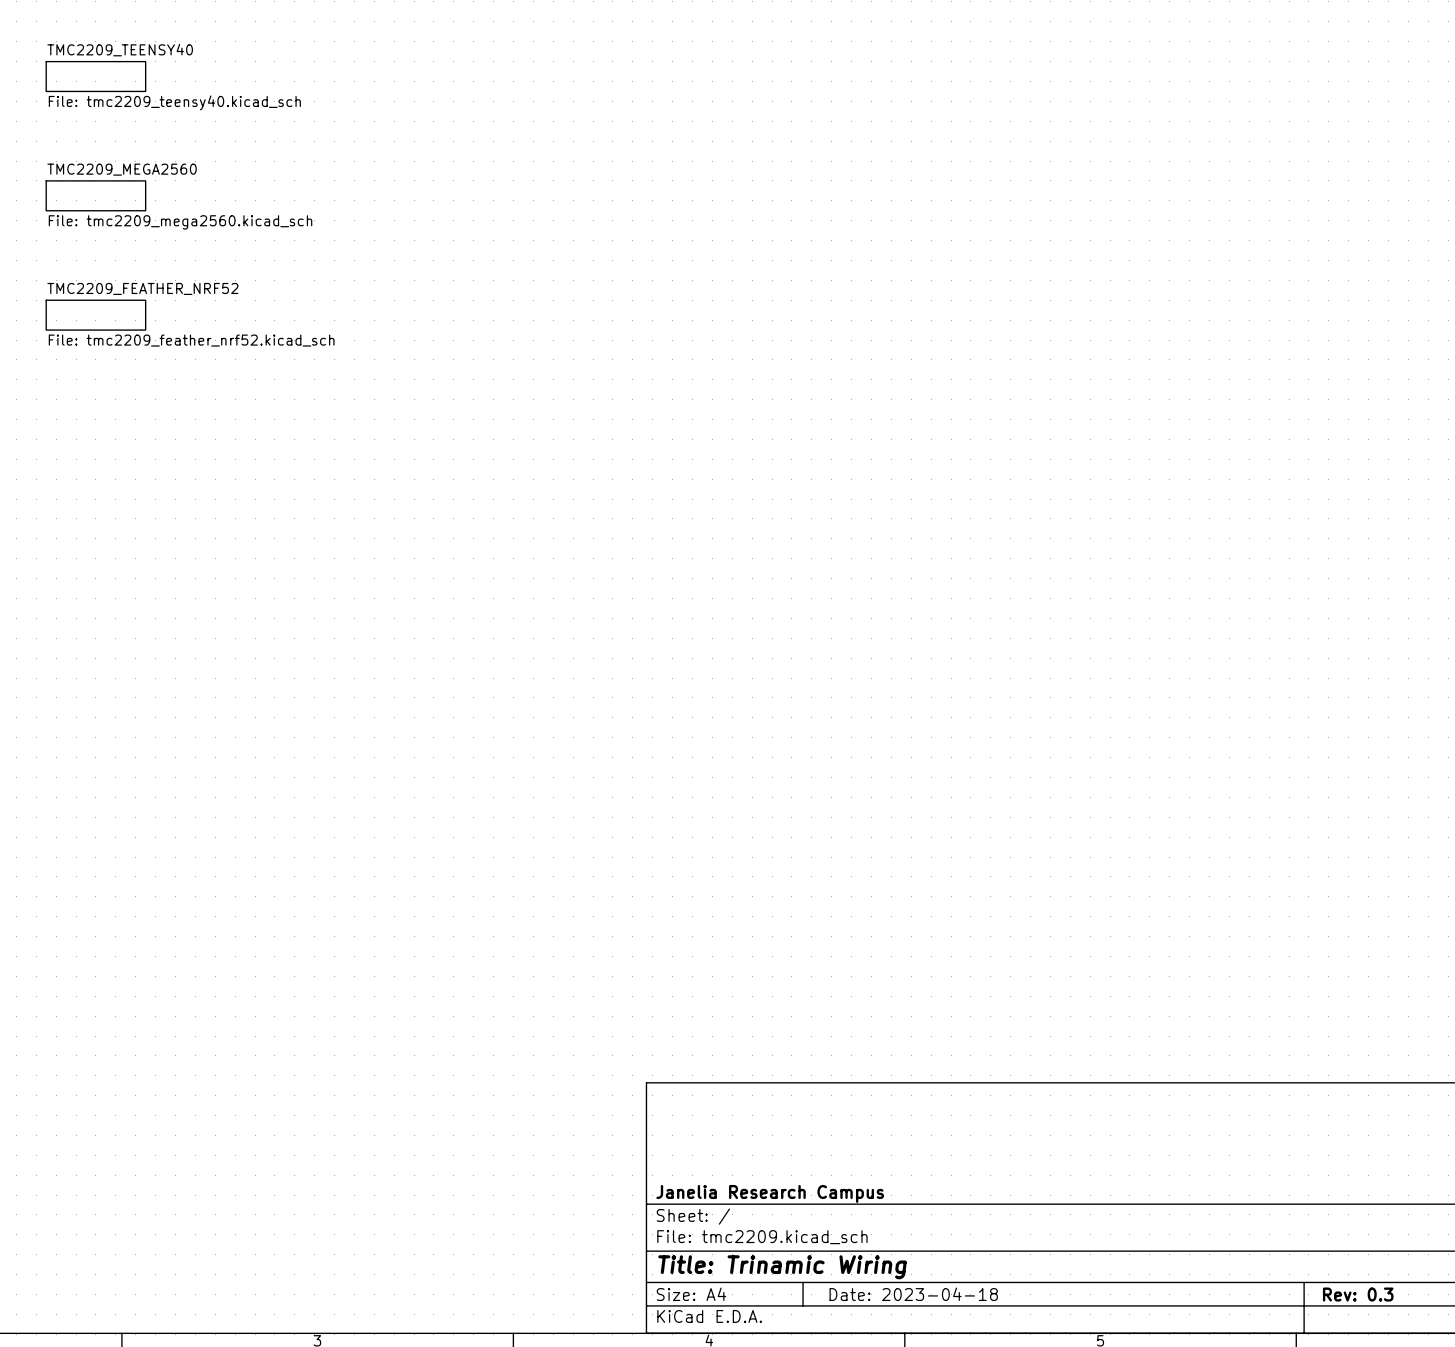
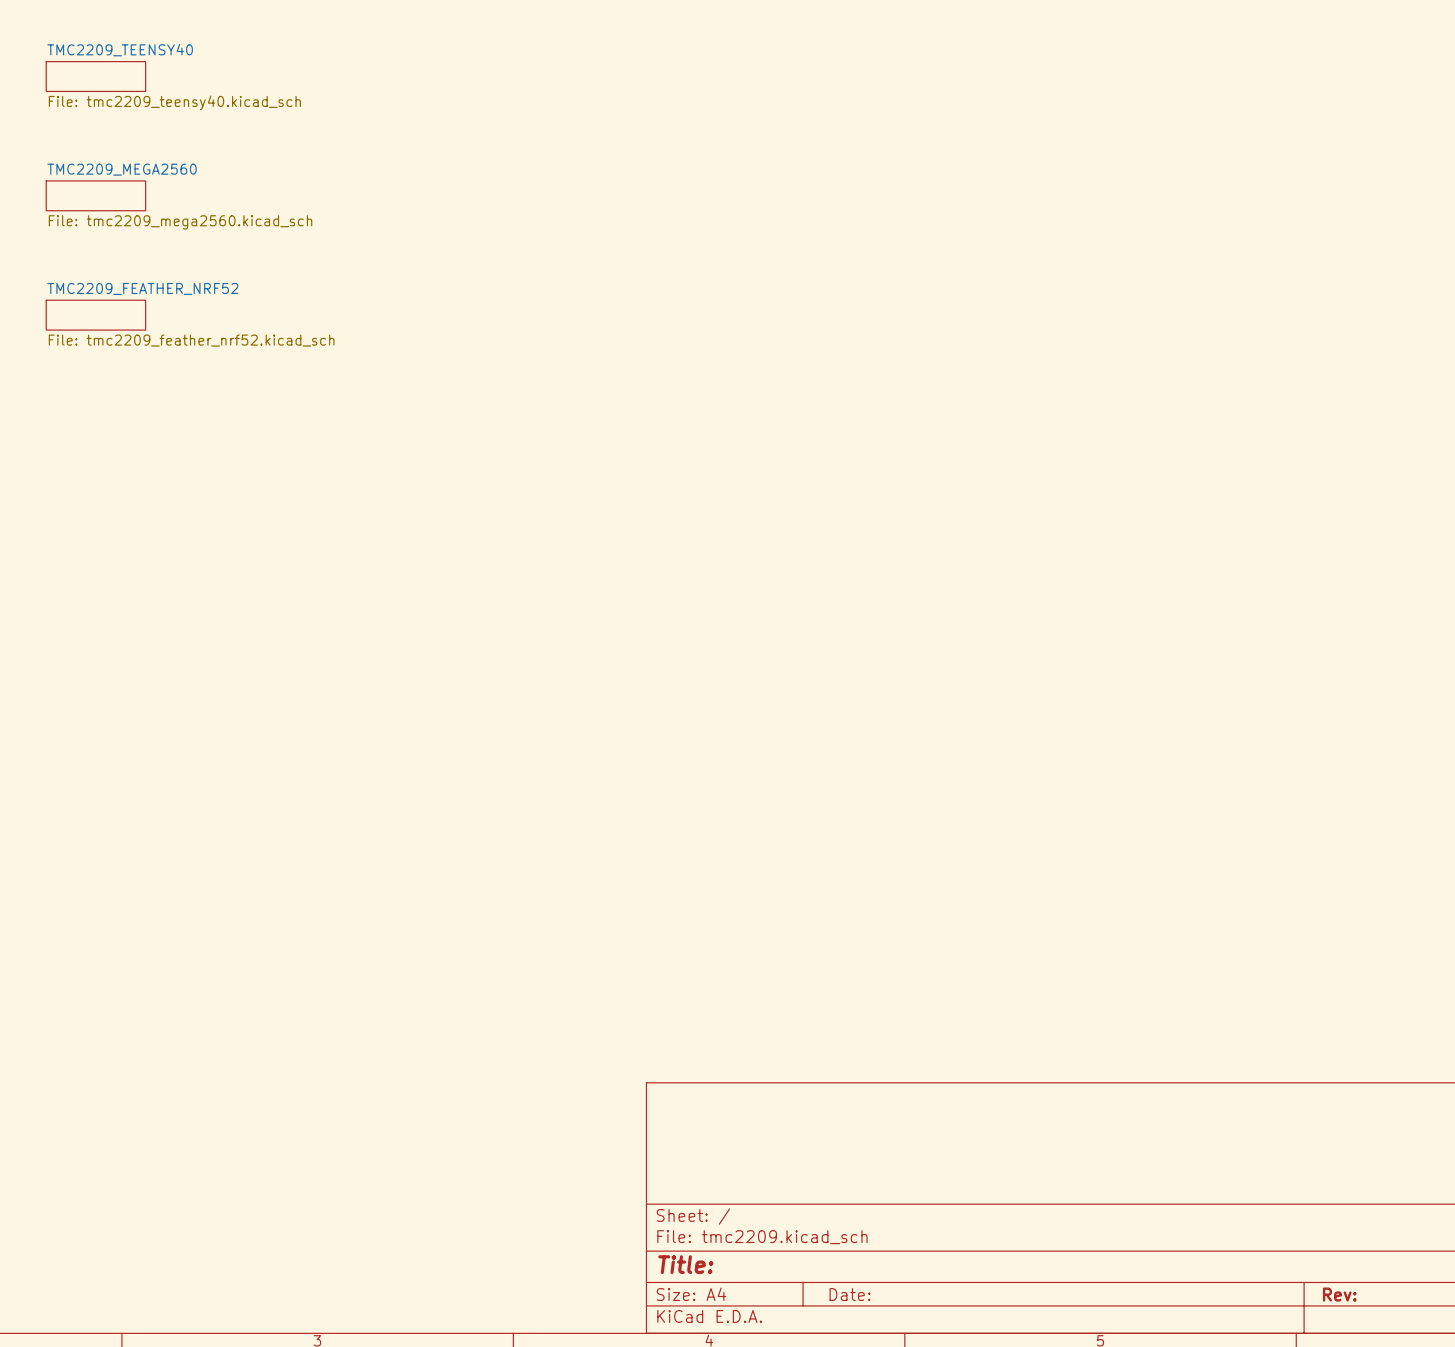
title block: Janelia Research Campus (770, 1193) -> none
title block: Title: Trinamic Wiring (782, 1267) -> Title: (685, 1264)
title block: Date: 2023-04-18 (913, 1294) -> Date: (849, 1294)
title block: Rev: 0.3 (1358, 1294) -> Rev: (1339, 1294)

